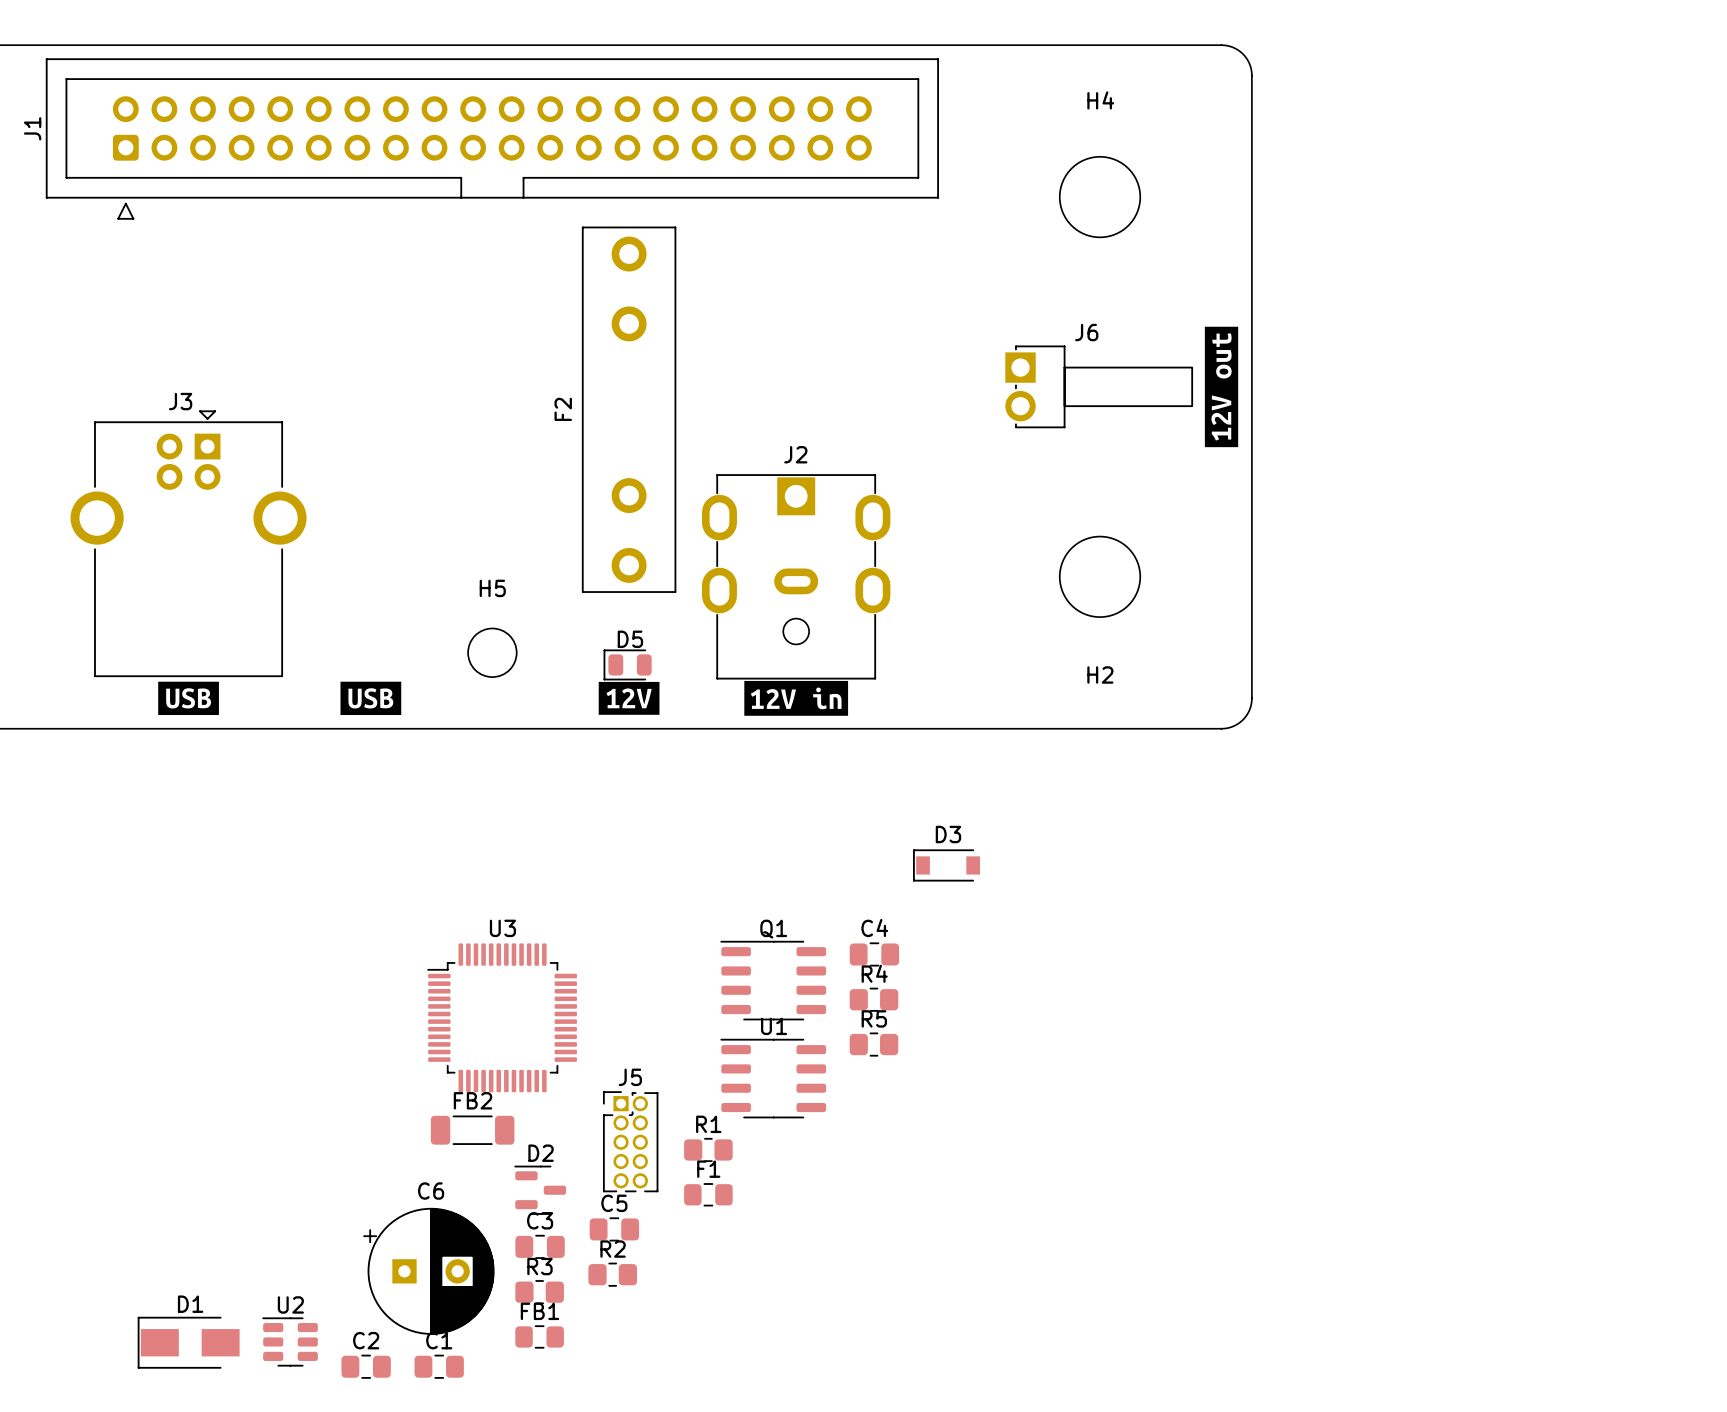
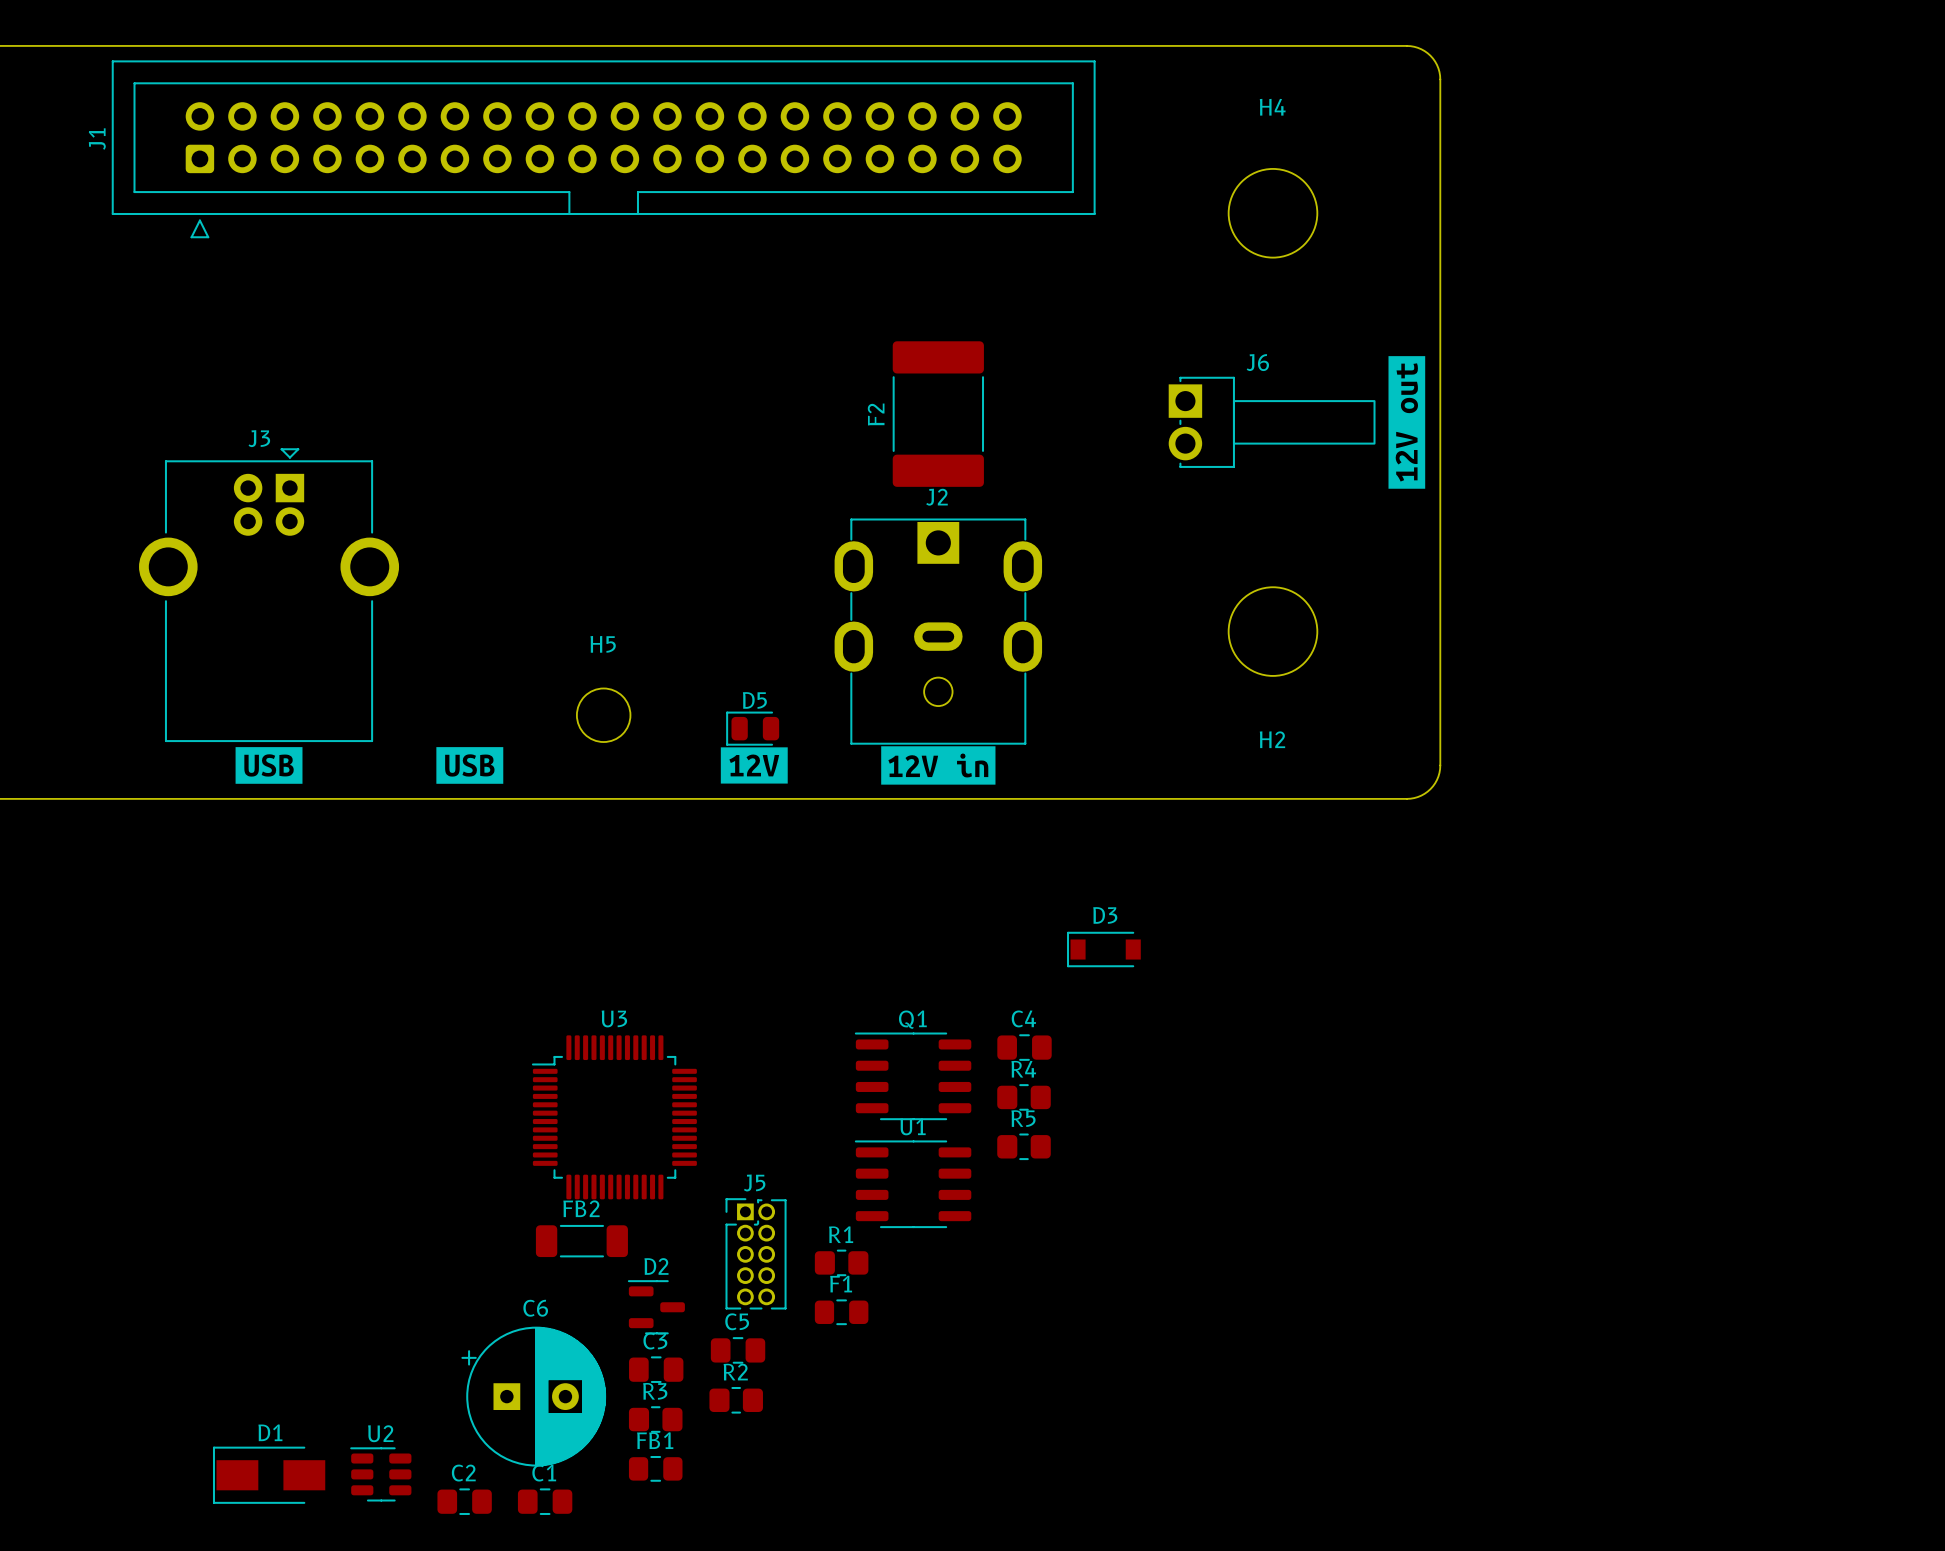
F2 footprint: [581, 226, 677, 593] -> [892, 341, 985, 487]

